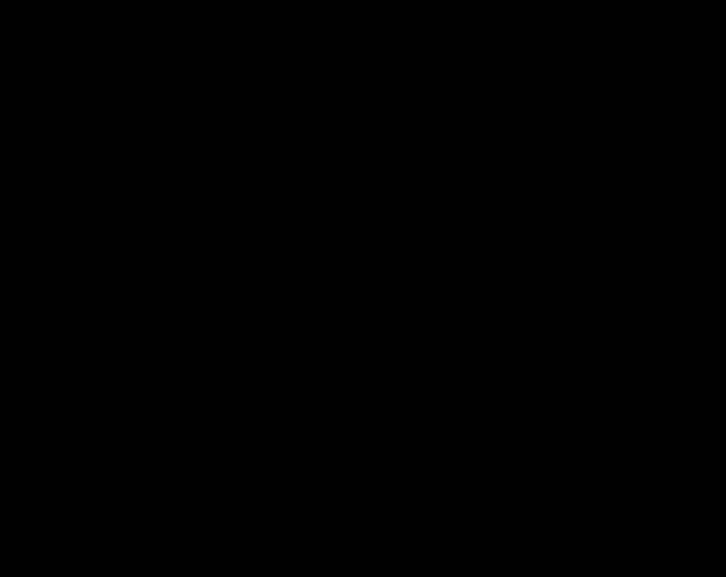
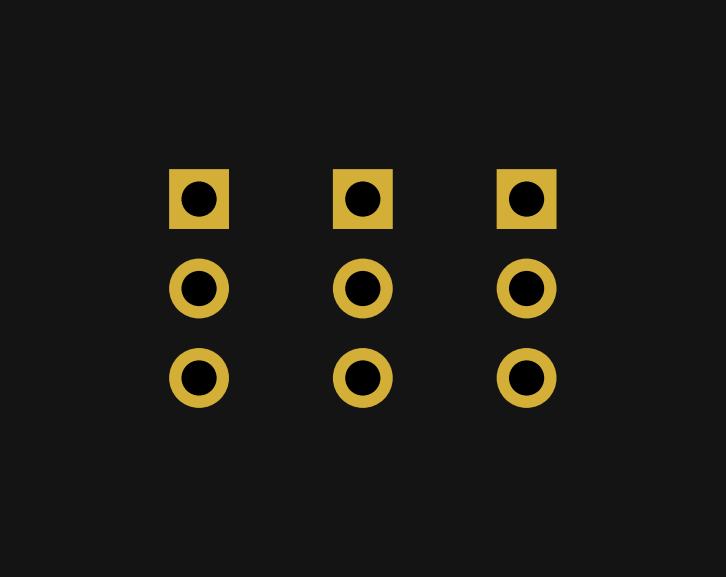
part: none -> (199, 288)
part: none -> (362, 288)
part: none -> (526, 288)

